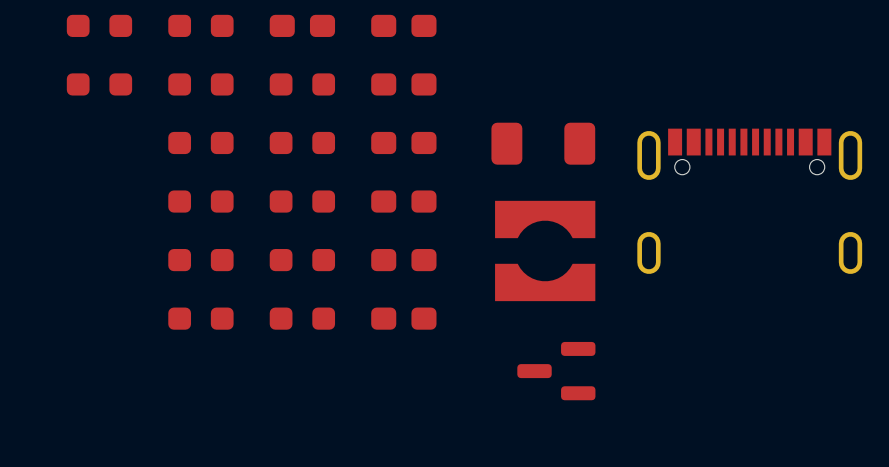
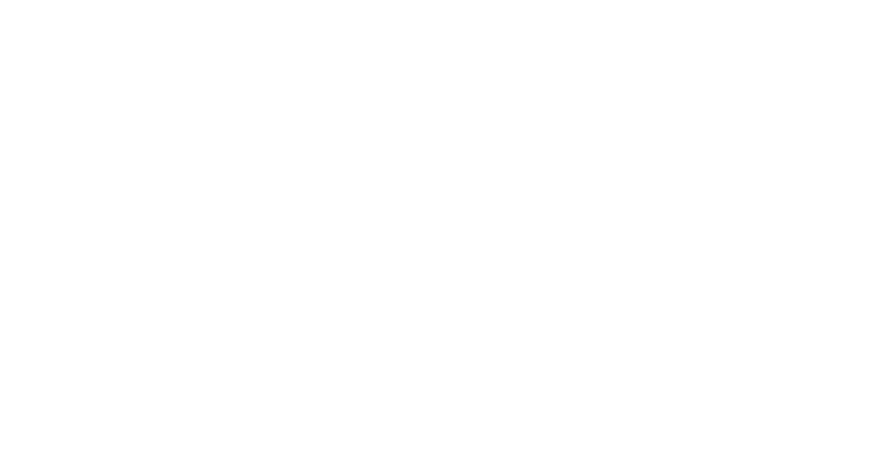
part: (99, 25) -> none
part: (200, 25) -> none
part: (302, 25) -> none
part: (403, 25) -> none
part: (99, 84) -> none
part: (200, 84) -> none
part: (302, 84) -> none
part: (403, 84) -> none
part: (200, 142) -> none
part: (302, 142) -> none
part: (403, 142) -> none
part: (543, 143) -> none
part: (200, 201) -> none
part: (302, 201) -> none
part: (403, 201) -> none
part: (749, 201) -> none
part: (545, 250) -> none
part: (200, 260) -> none
part: (302, 260) -> none
part: (403, 260) -> none
part: (200, 318) -> none
part: (302, 318) -> none
part: (403, 318) -> none
part: (556, 371) -> none

